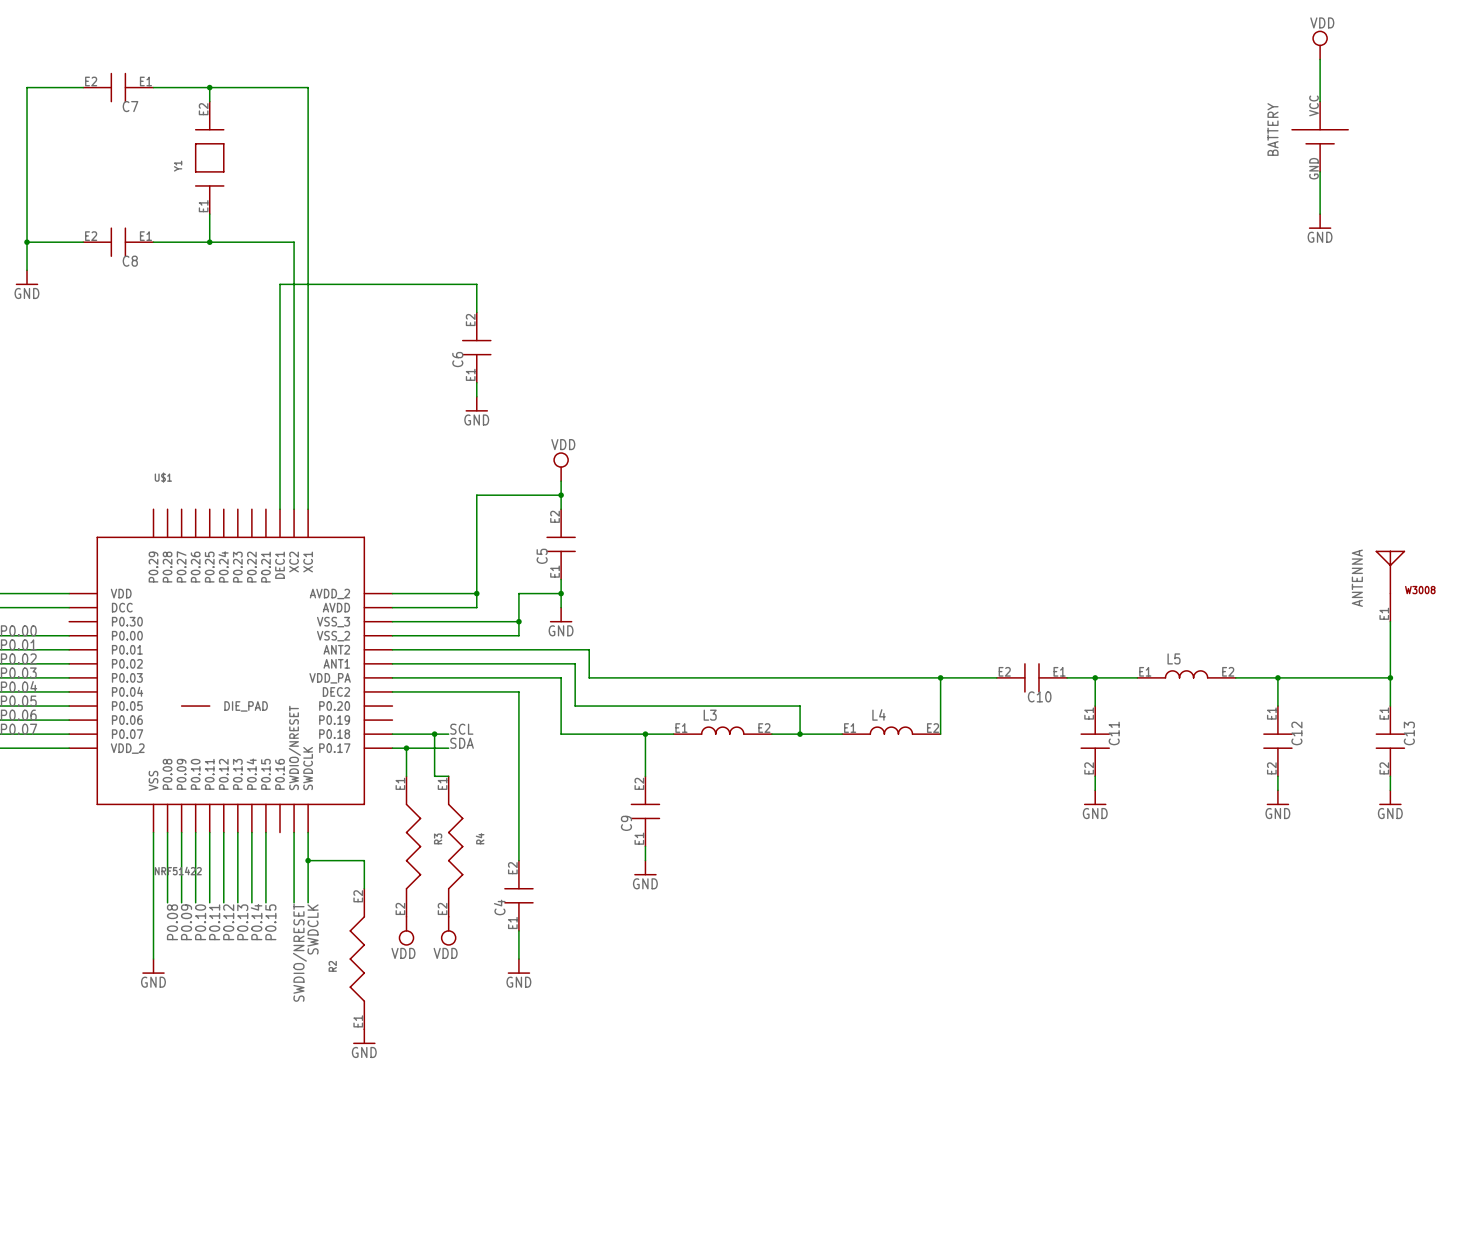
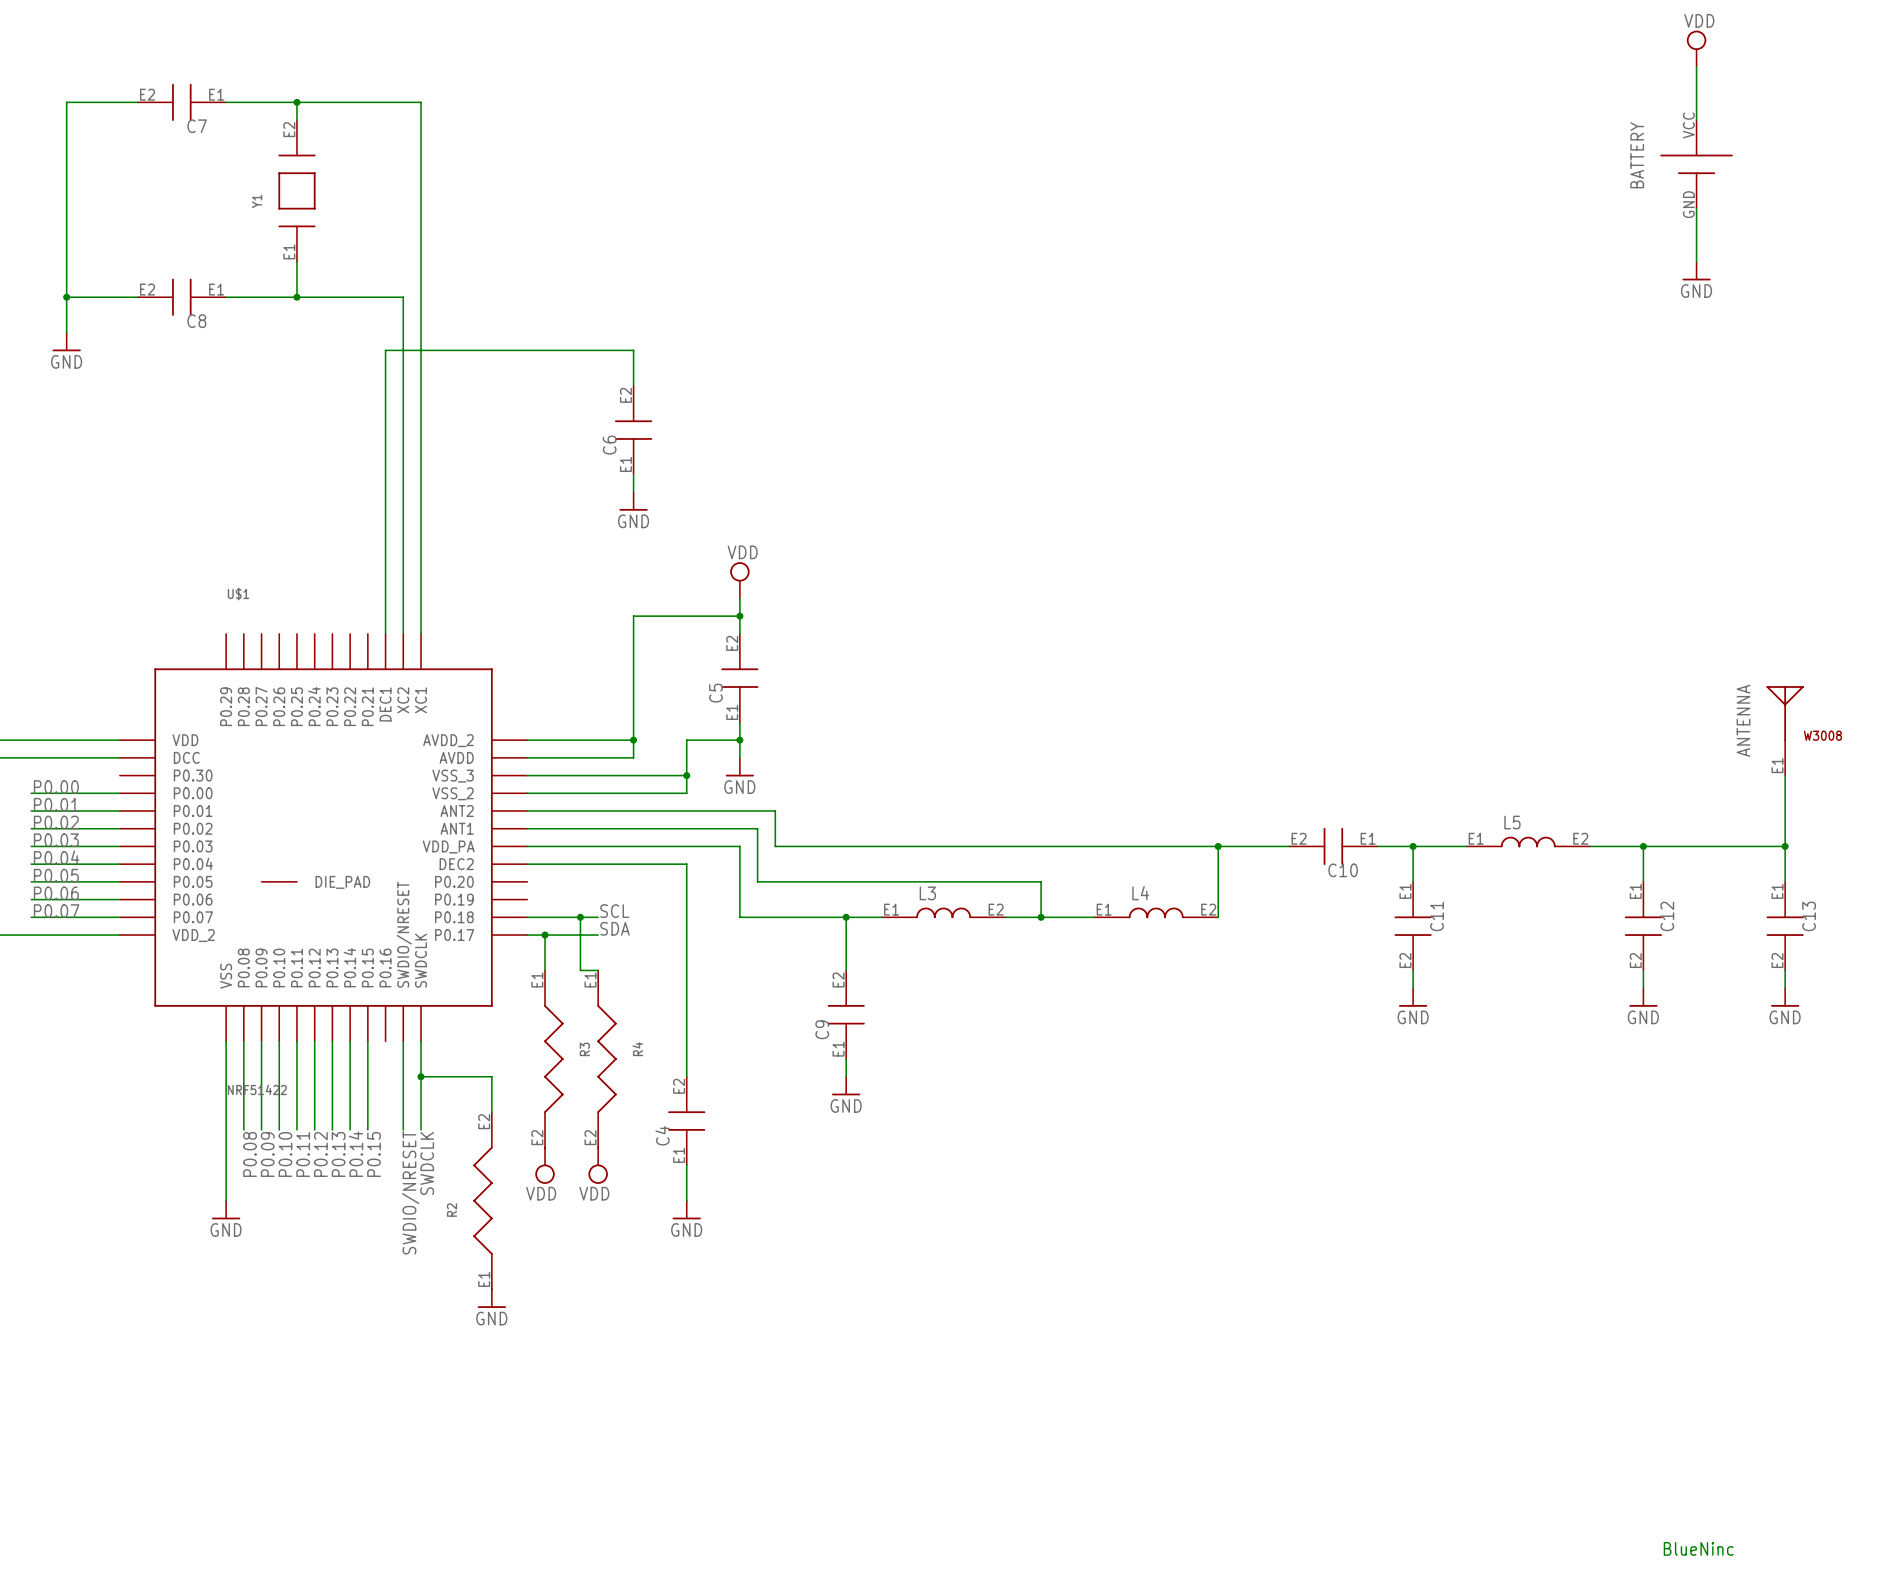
text: none -> BlueNinc (1698, 1548)

